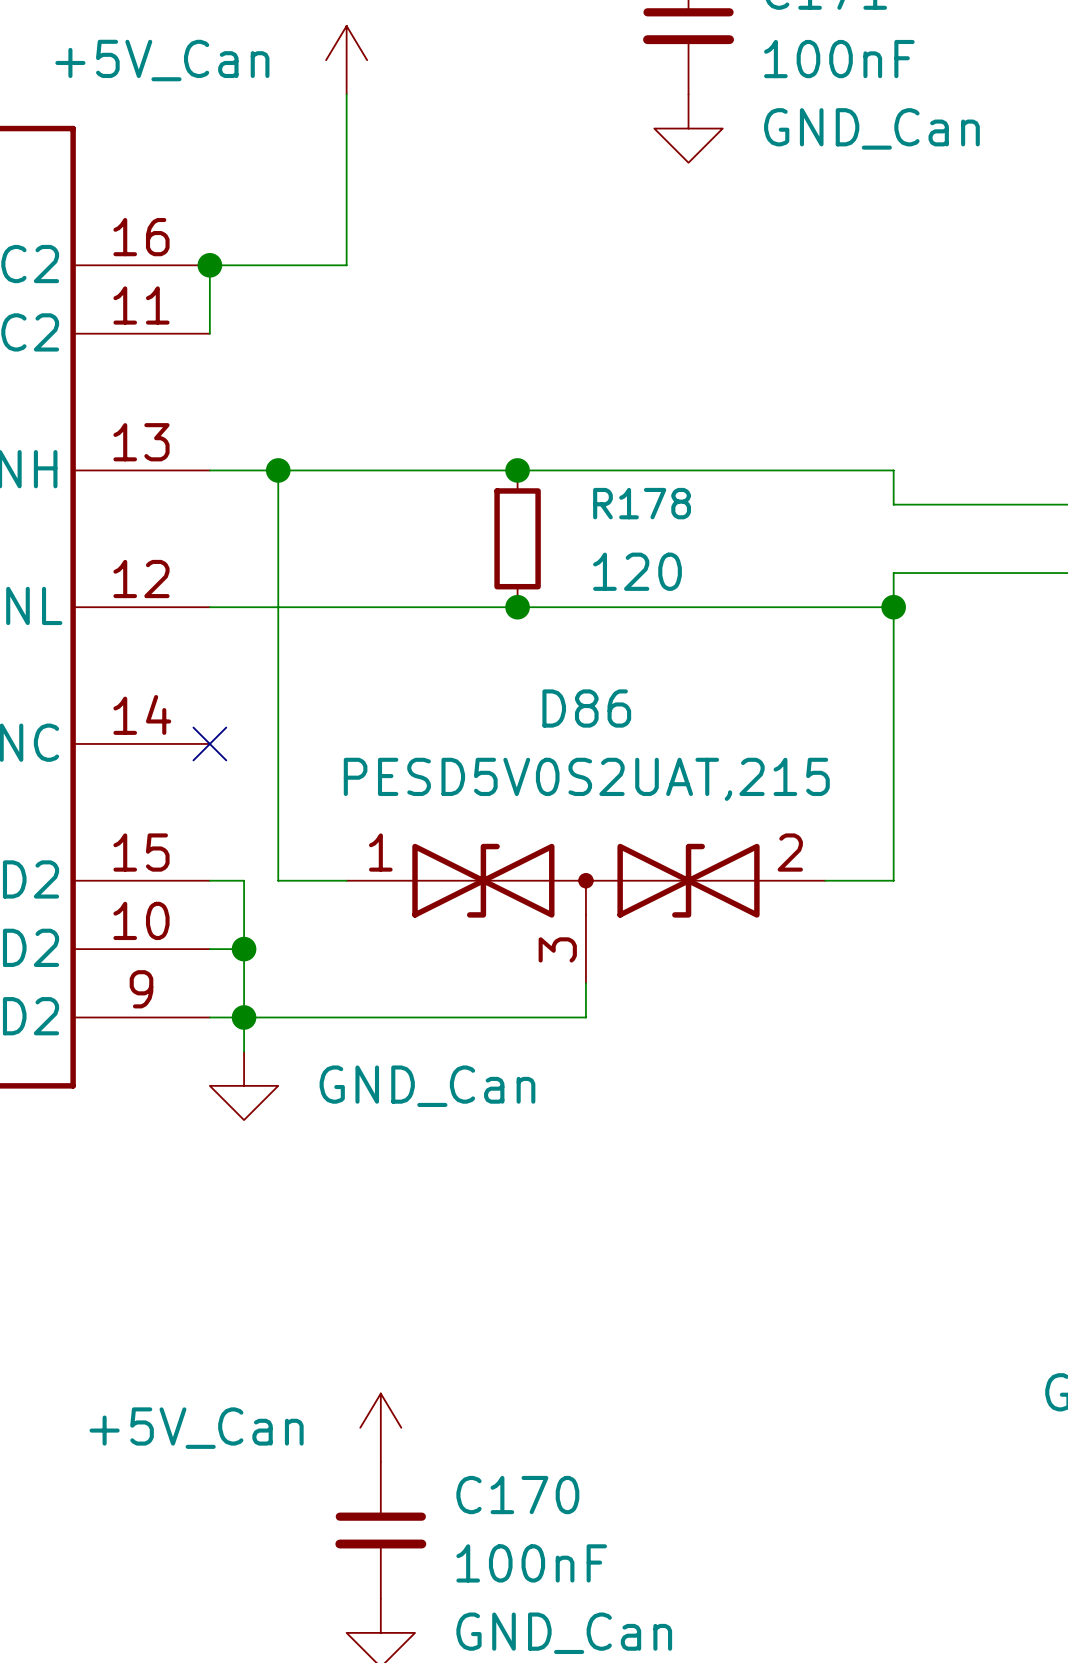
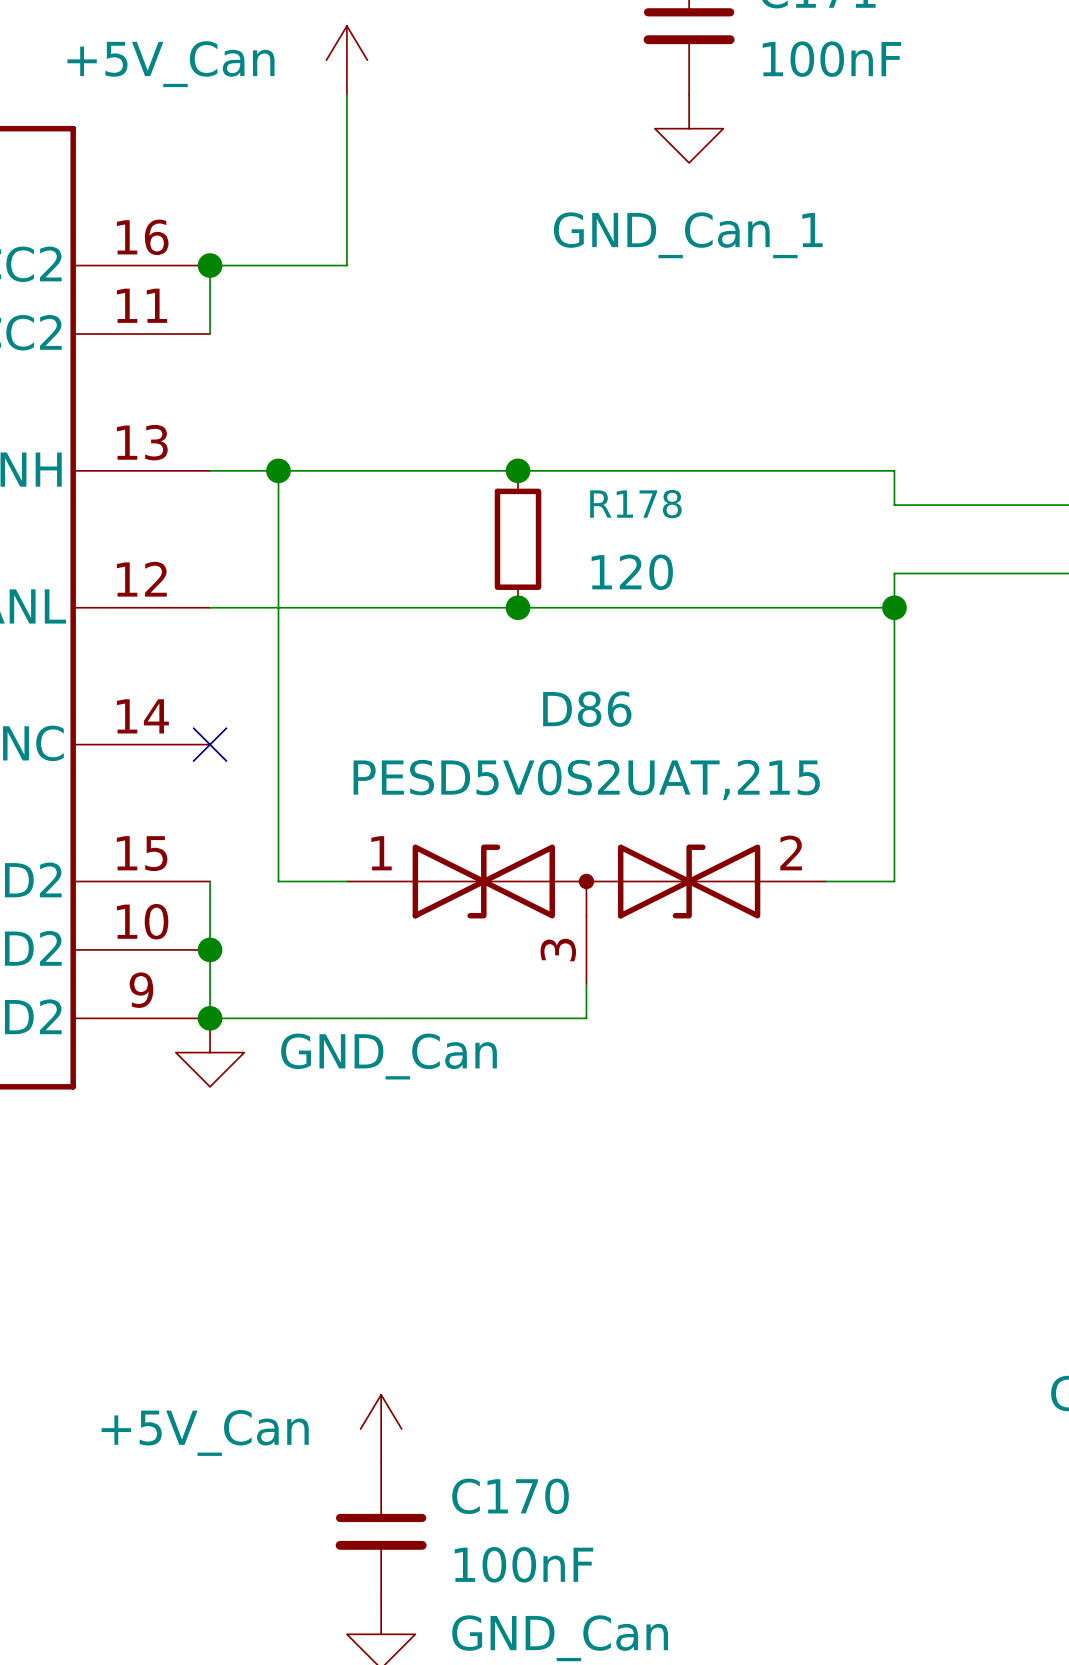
power symbol: GND_Can (688, 128) -> GND_Can_1 (689, 128)
wire: (209, 880) (244, 880) (244, 1051) -> (210, 881) (210, 1018)
wire: (209, 949) (244, 949) -> none
junction position: (244, 949) -> (210, 949)
junction position: (244, 1017) -> (210, 1018)
power symbol position: GND_Can (244, 1085) -> GND_Can (210, 1052)

